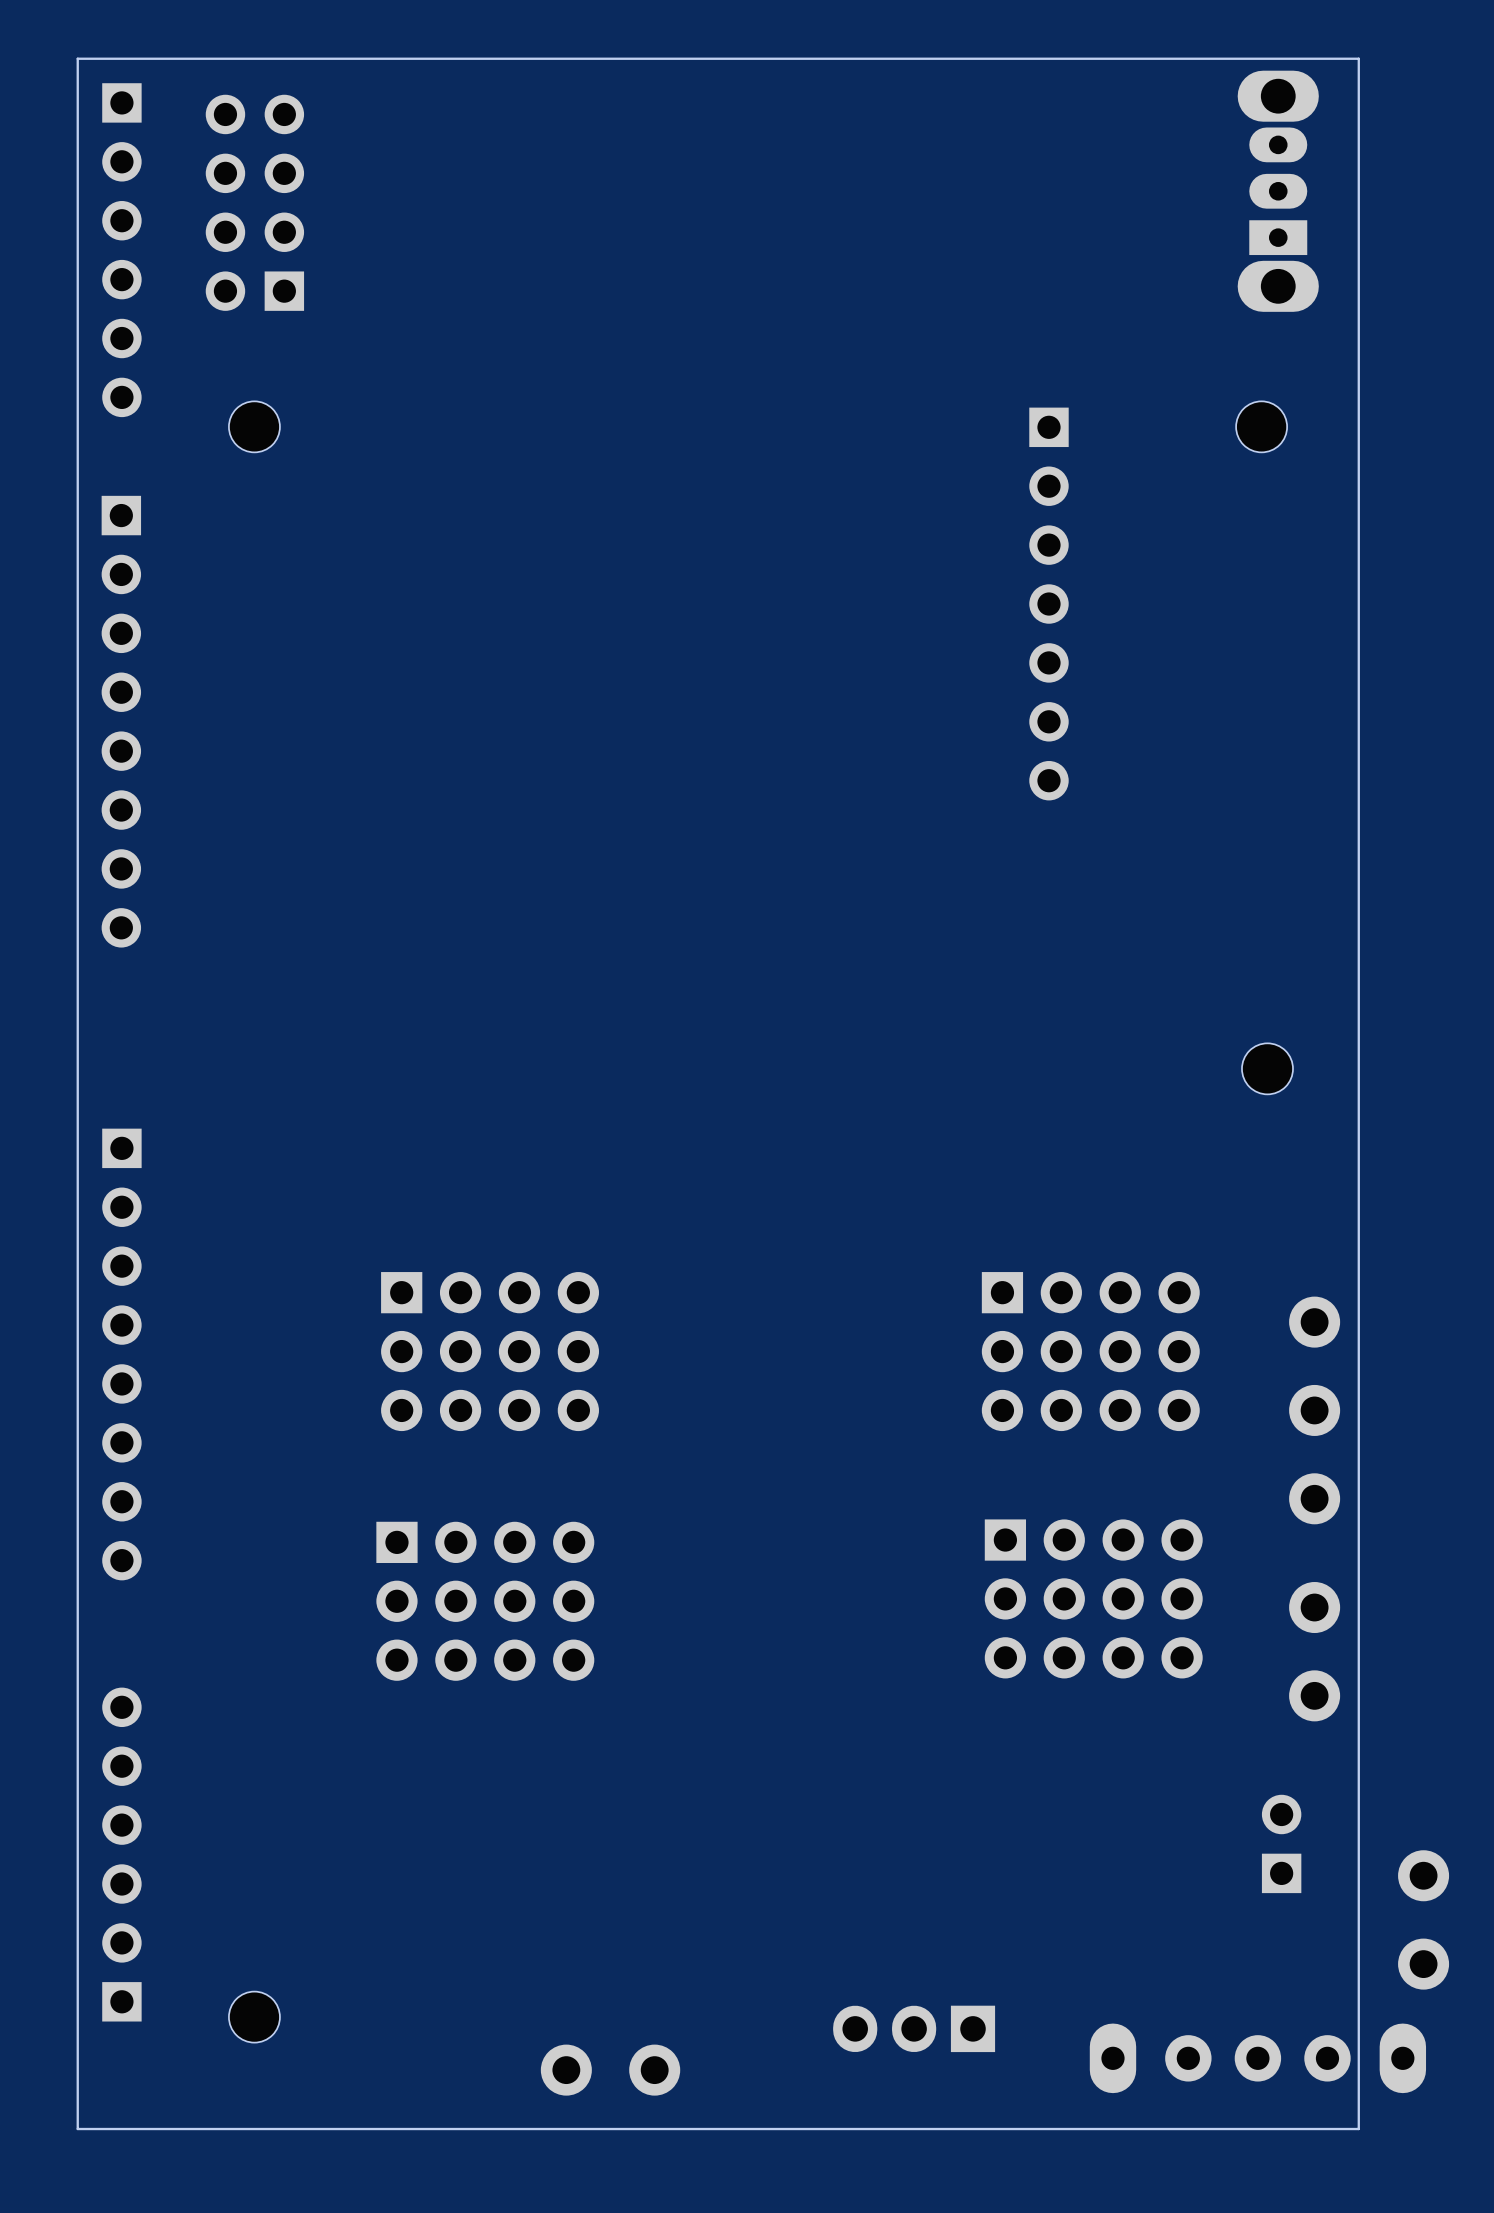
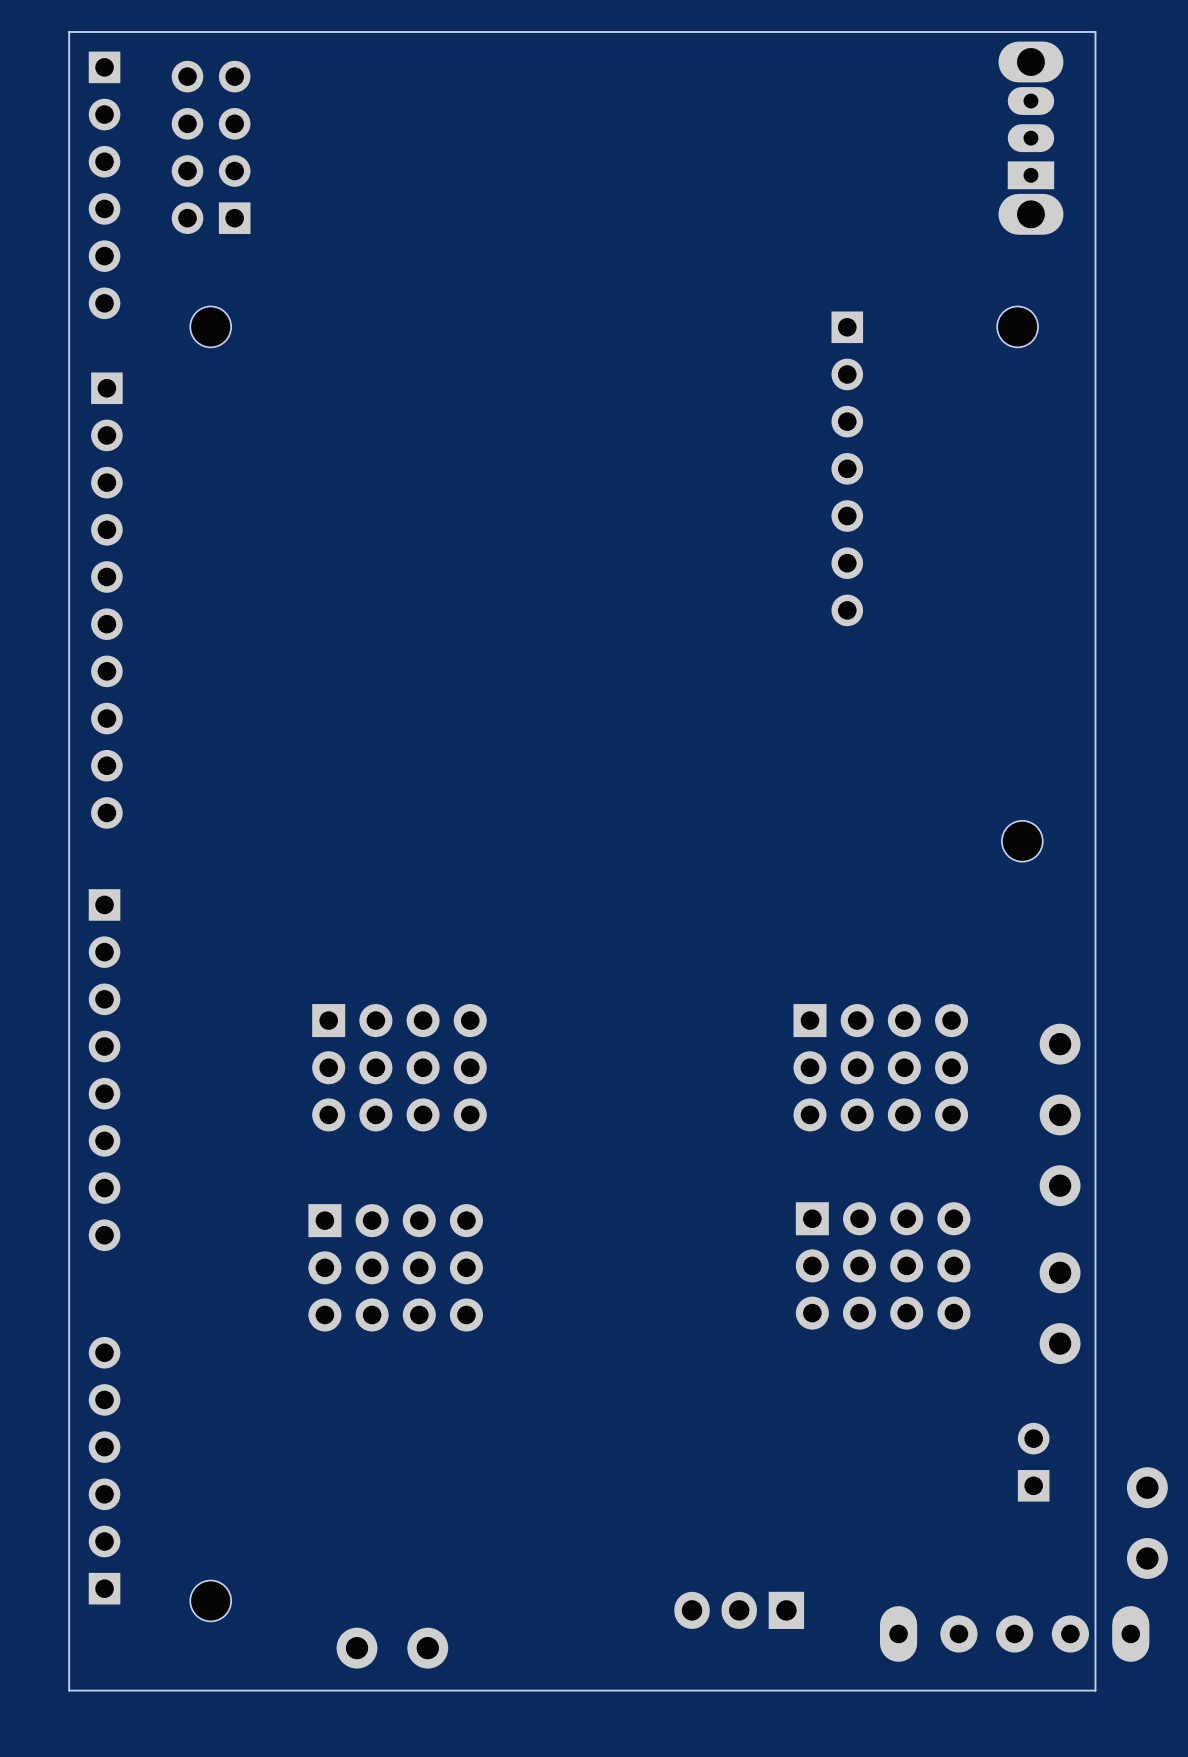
part: (121, 721) -> none
part: none -> (106, 600)
part position: (610, 2070) -> (392, 1648)

